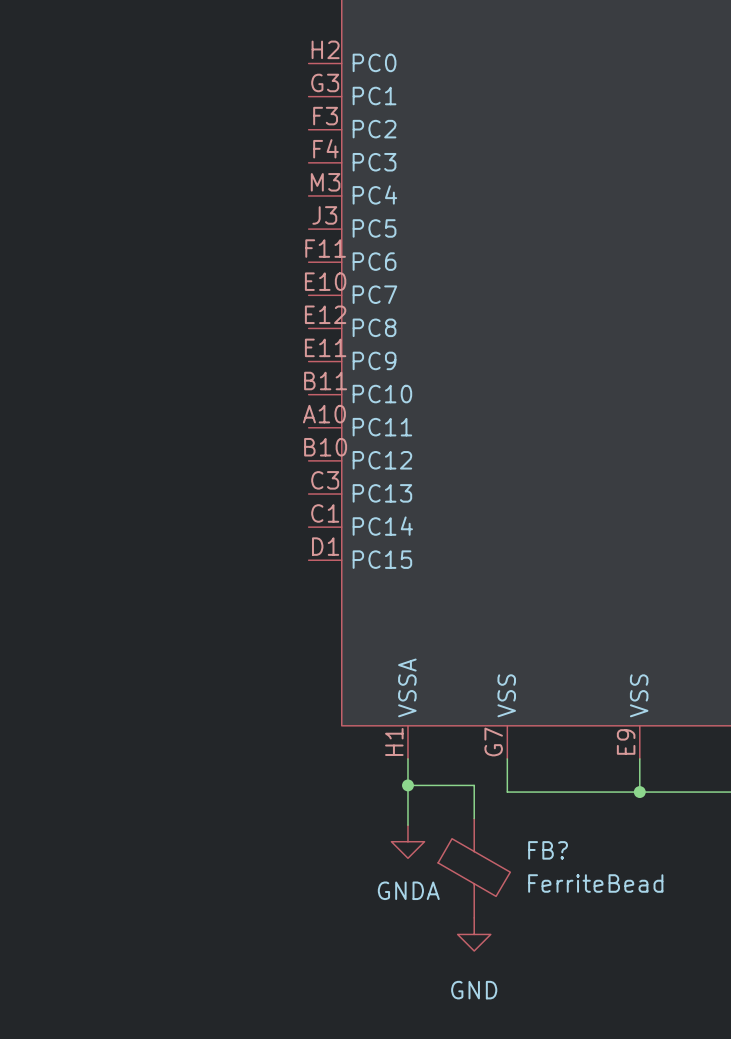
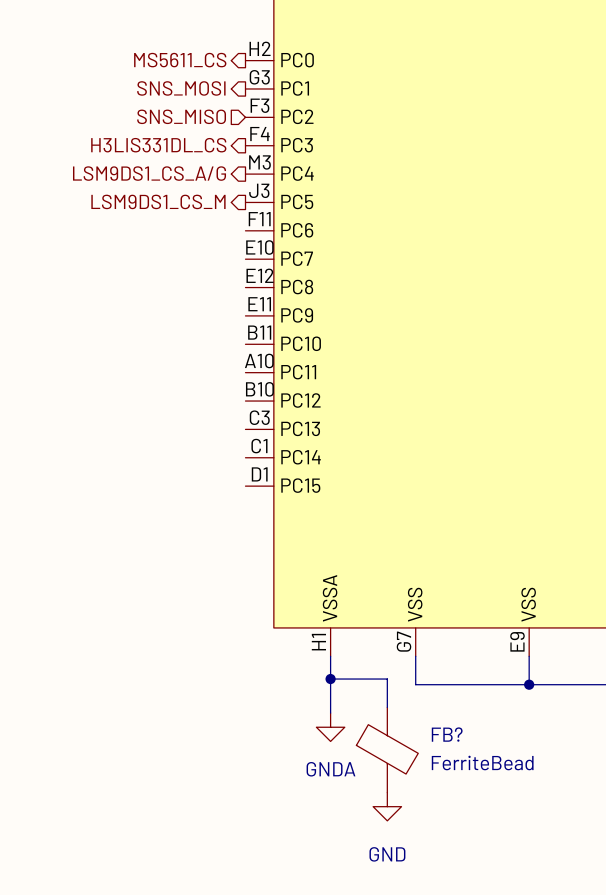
hierarchical label: none -> MS5611_CS (180, 60)
hierarchical label: none -> SNS_MOSI (181, 88)
hierarchical label: none -> SNS_MISO (181, 116)
hierarchical label: none -> H3LIS331DL_CS (158, 145)
hierarchical label: none -> LSM9DS1_CS_A/G (149, 173)
hierarchical label: none -> LSM9DS1_CS_M (158, 201)

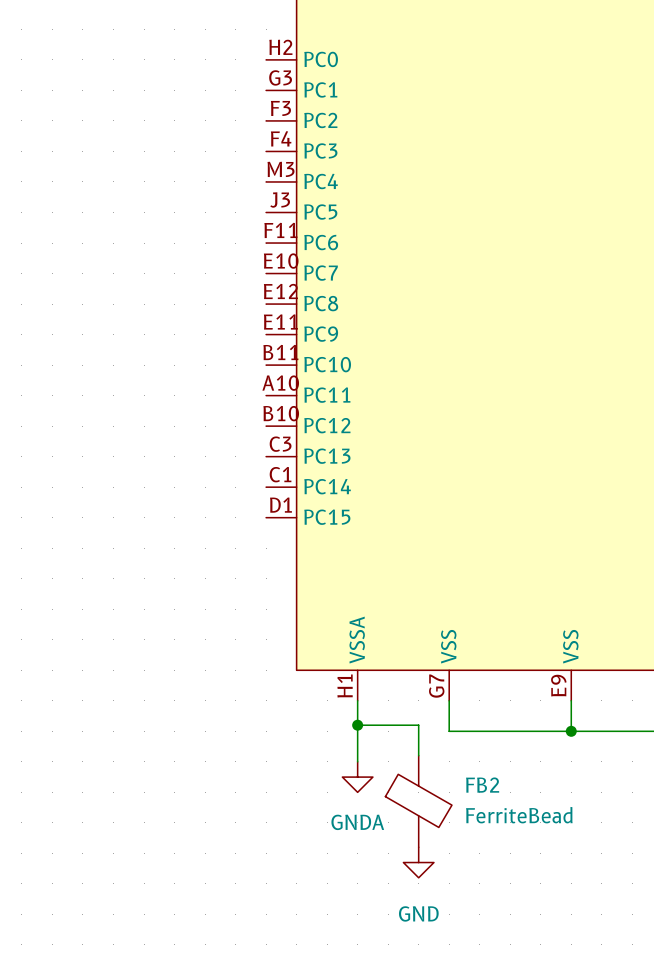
hierarchical label: MS5611_CS (180, 60) -> none
hierarchical label: SNS_MOSI (181, 88) -> none
hierarchical label: SNS_MISO (181, 116) -> none
hierarchical label: H3LIS331DL_CS (158, 145) -> none
hierarchical label: LSM9DS1_CS_A/G (149, 173) -> none
hierarchical label: LSM9DS1_CS_M (158, 201) -> none
FB? name: FB? (447, 734) -> FB2 (482, 785)

